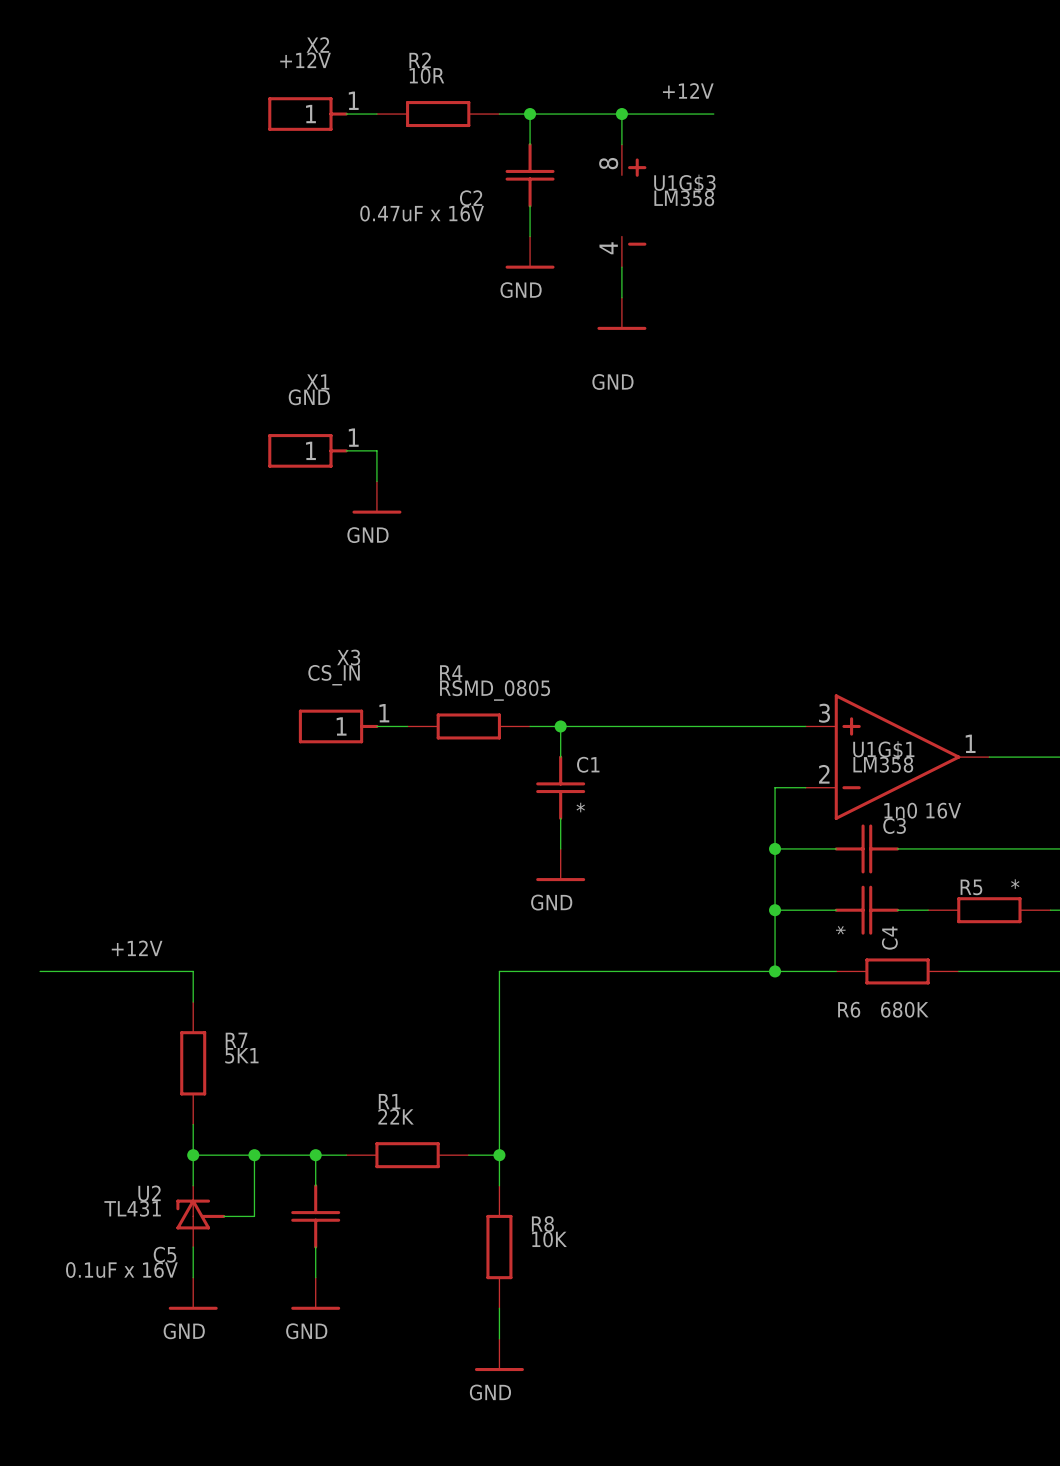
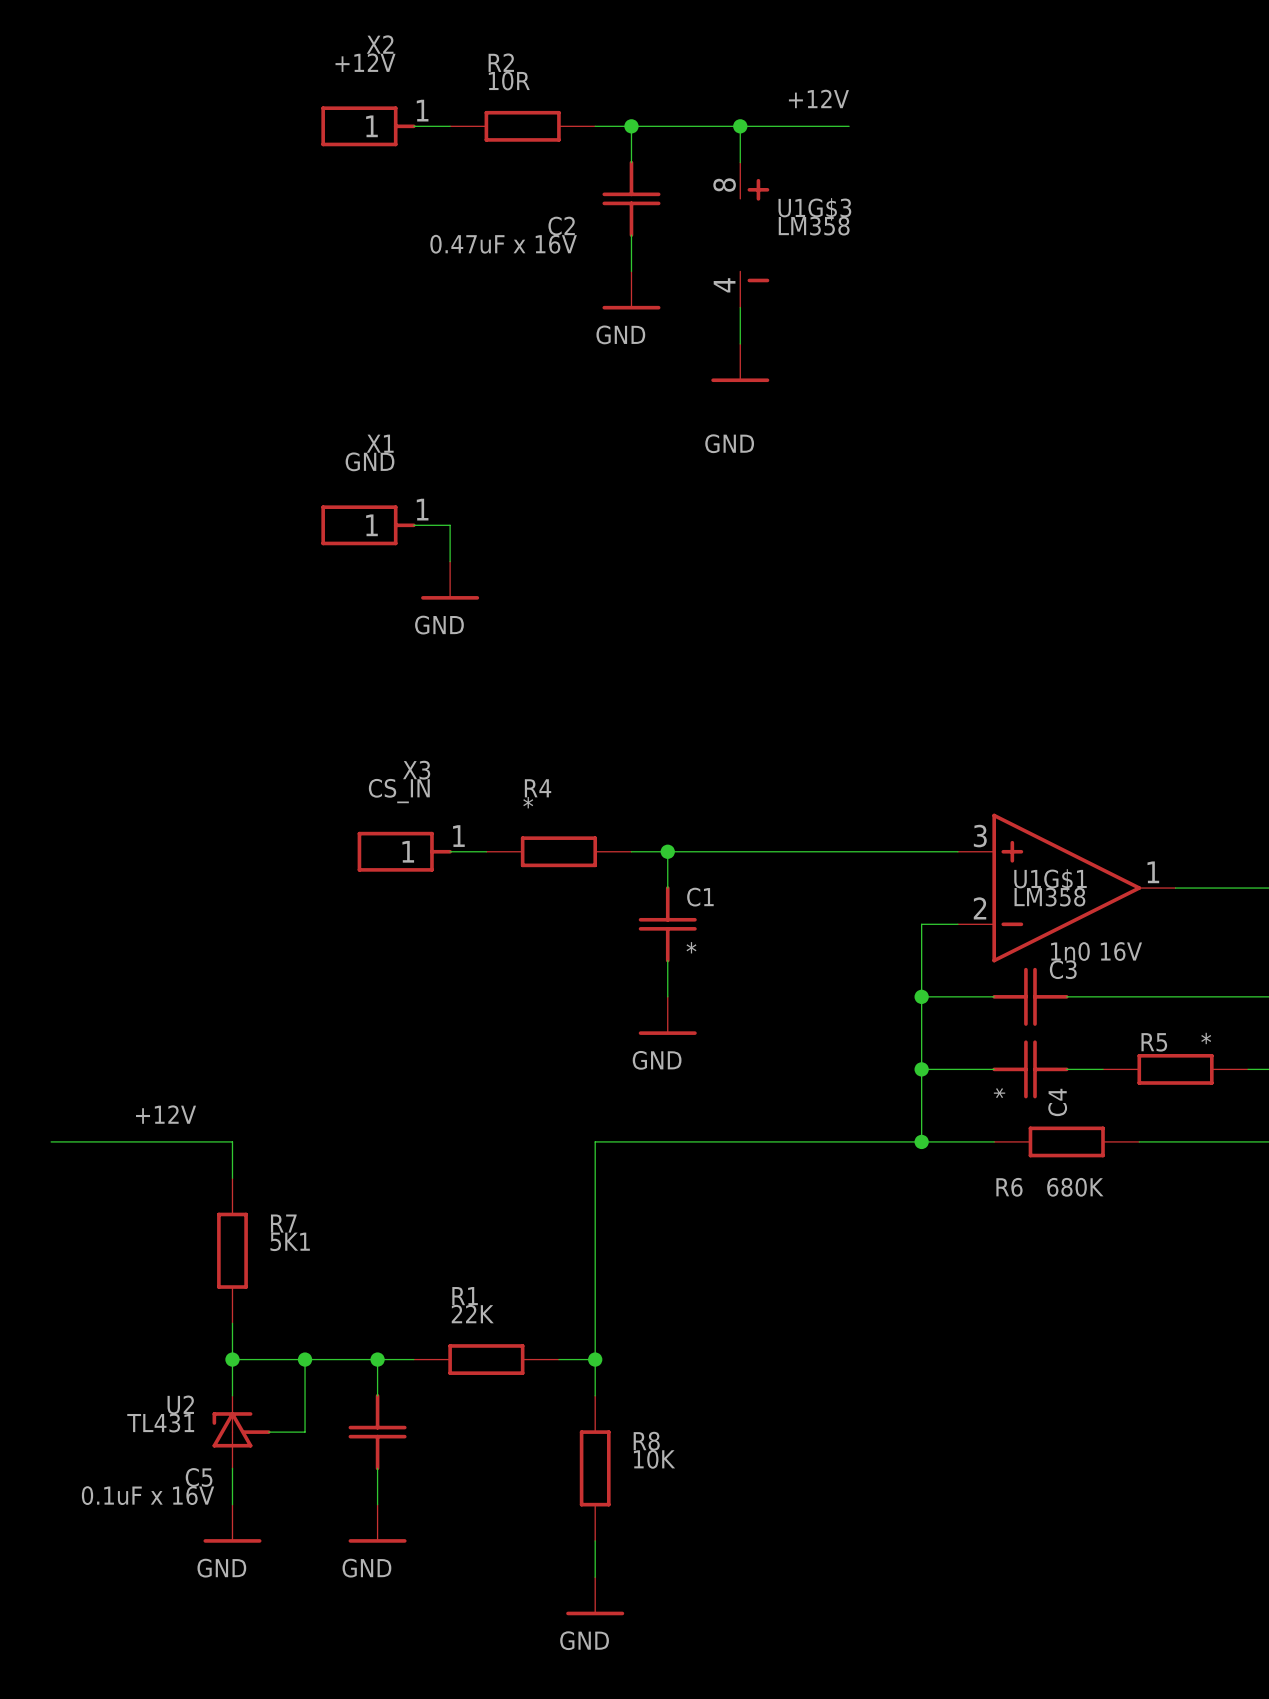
R4 value: RSMD_0805 (495, 690) -> * (528, 802)

